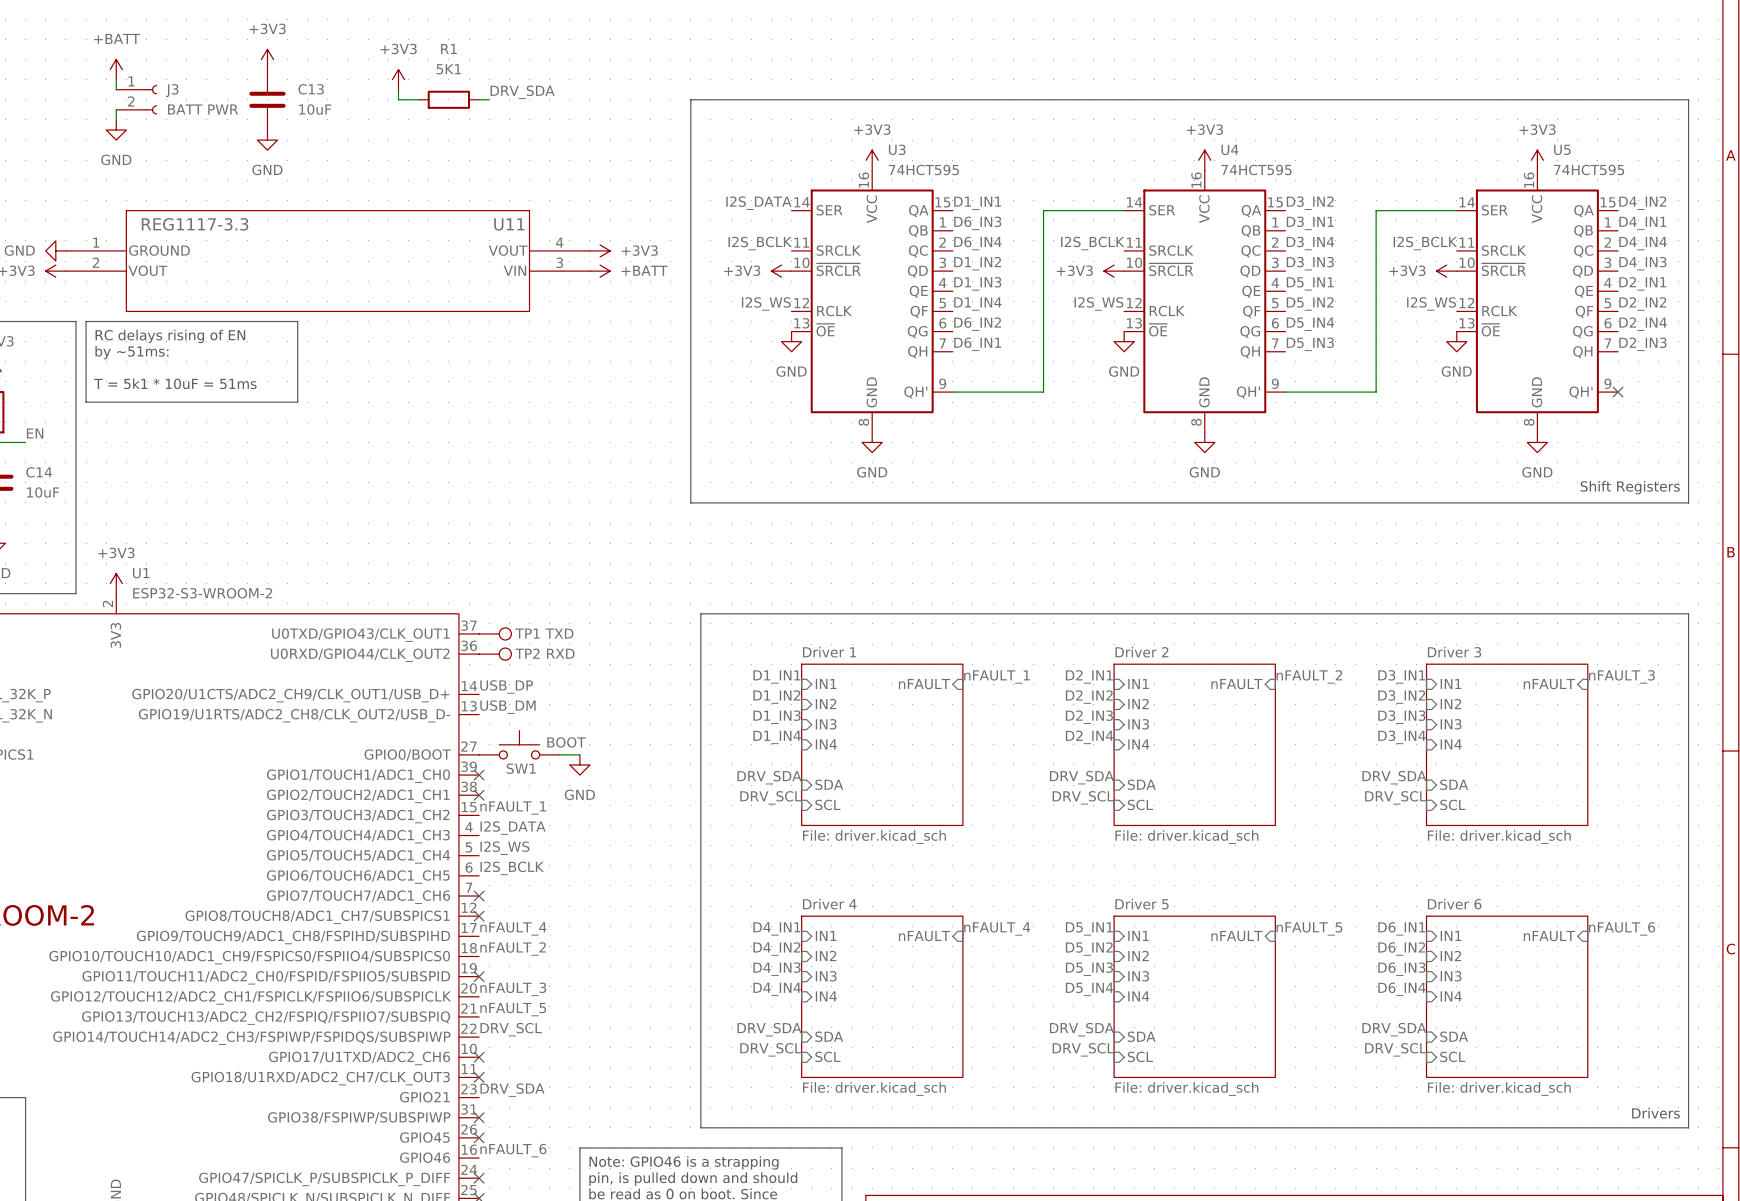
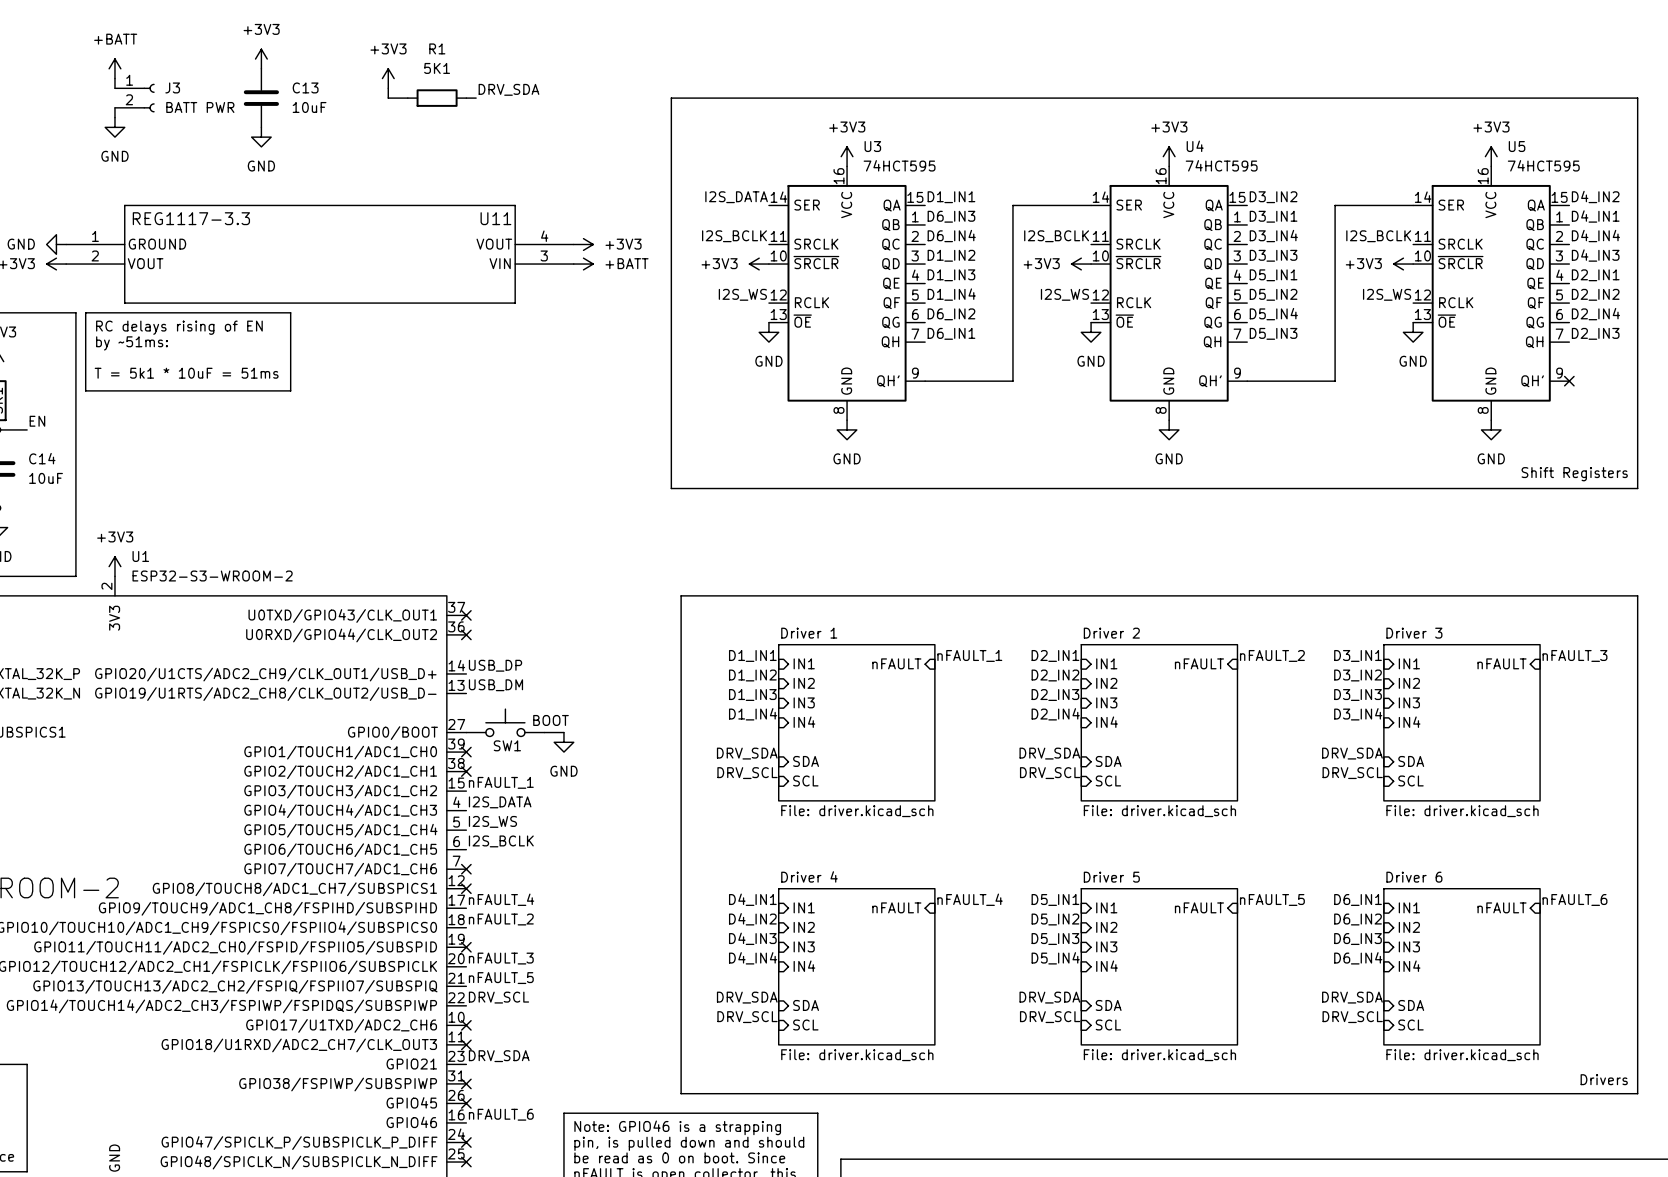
no-connect mark: none -> (466, 615)
TP1: TXD (495, 633) -> none
no-connect mark: none -> (466, 634)
TP2: RXD (495, 654) -> none

